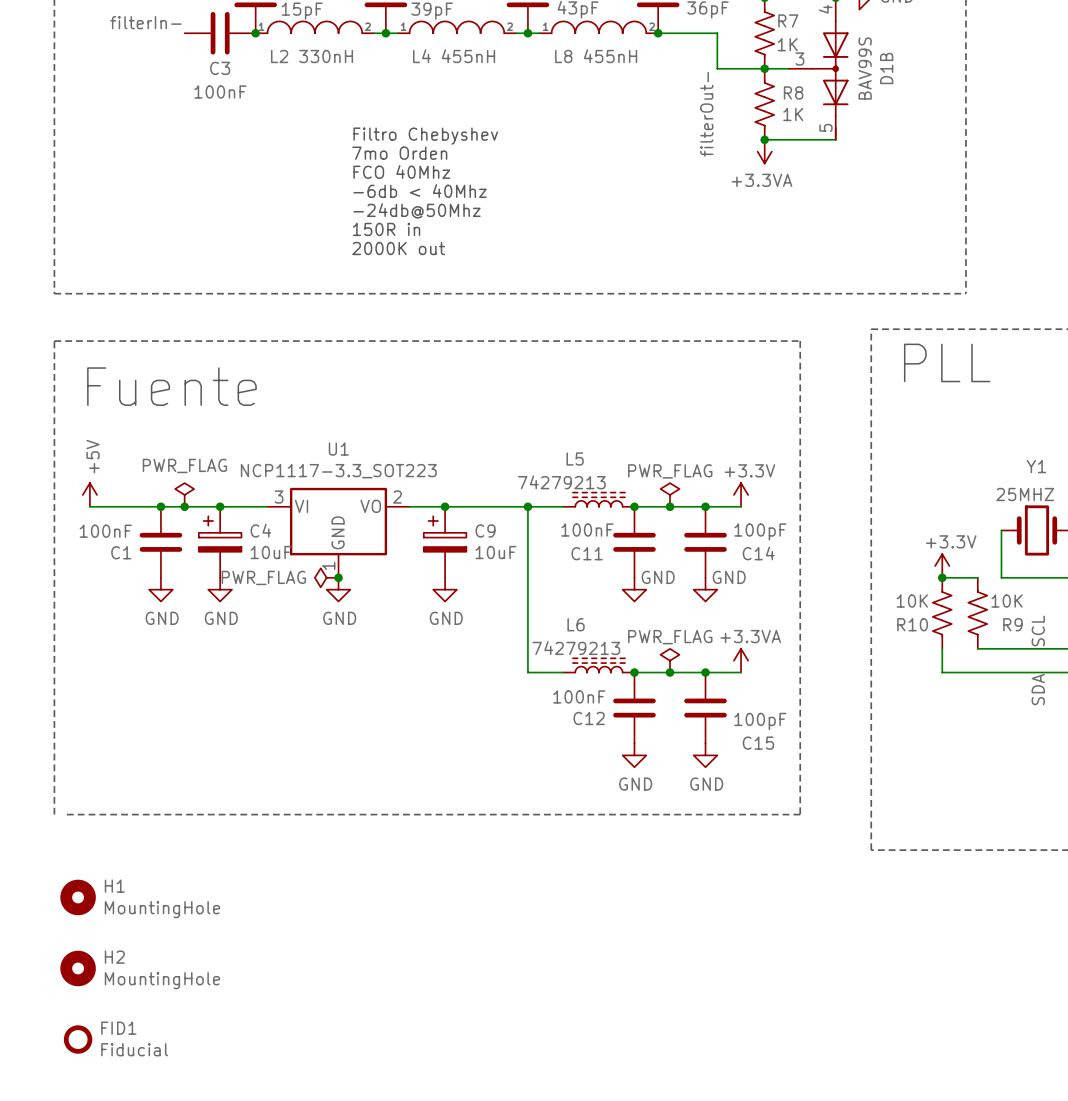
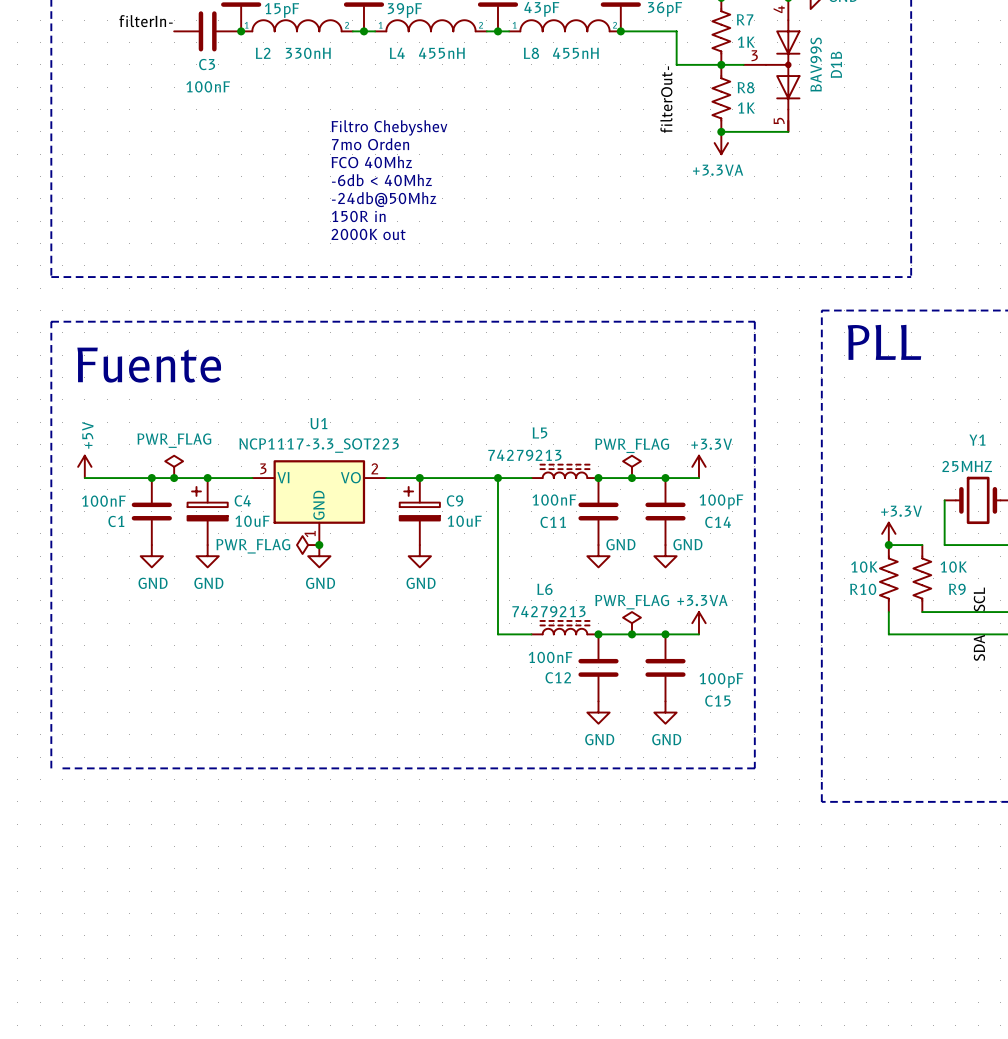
H1: MountingHole (78, 897) -> none
H2: MountingHole (78, 968) -> none
FID1: Fiducial (78, 1039) -> none

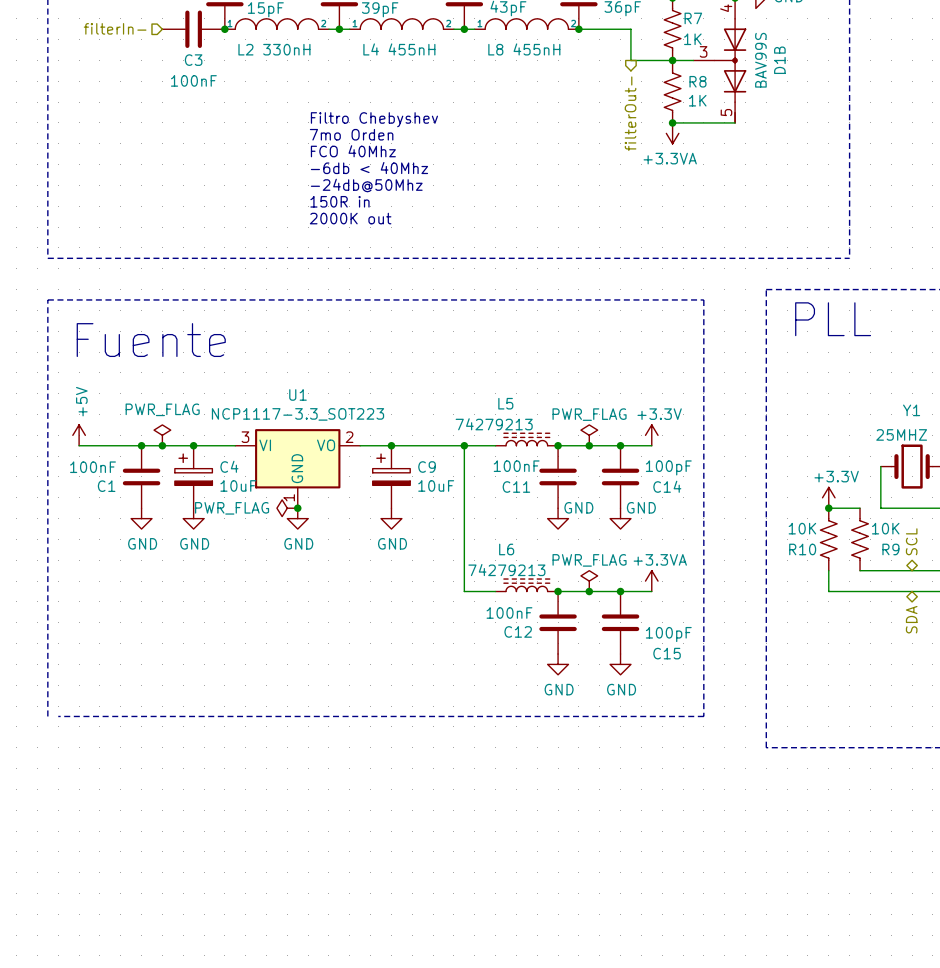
label: filterIn- (146, 21) -> none
hierarchical label: none -> filterIn- (115, 28)
label: filterOut- (666, 99) -> none
hierarchical label: none -> filterOut- (630, 113)
hierarchical label: none -> SCL (911, 541)
label: SCL (979, 599) -> none
label: SDA (979, 647) -> none
hierarchical label: none -> SDA (911, 619)

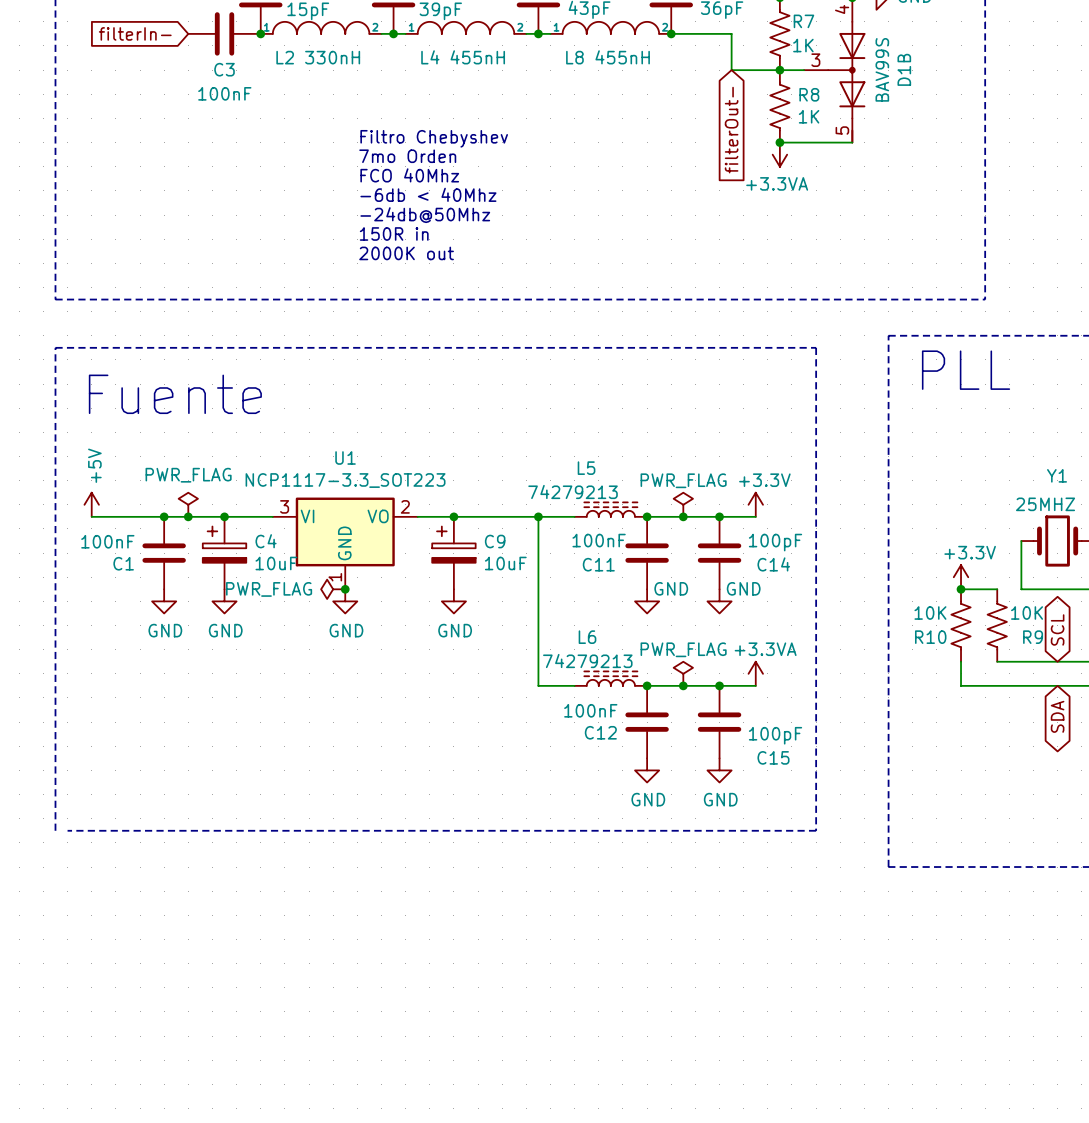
hierarchical label: filterIn- (115, 28) -> none
global label: none -> filterIn- (135, 33)
global label: none -> filterOut- (731, 130)
hierarchical label: filterOut- (630, 113) -> none
hierarchical label: SCL (911, 541) -> none
global label: none -> SCL (1057, 629)
global label: none -> SDA (1057, 716)
hierarchical label: SDA (911, 619) -> none

